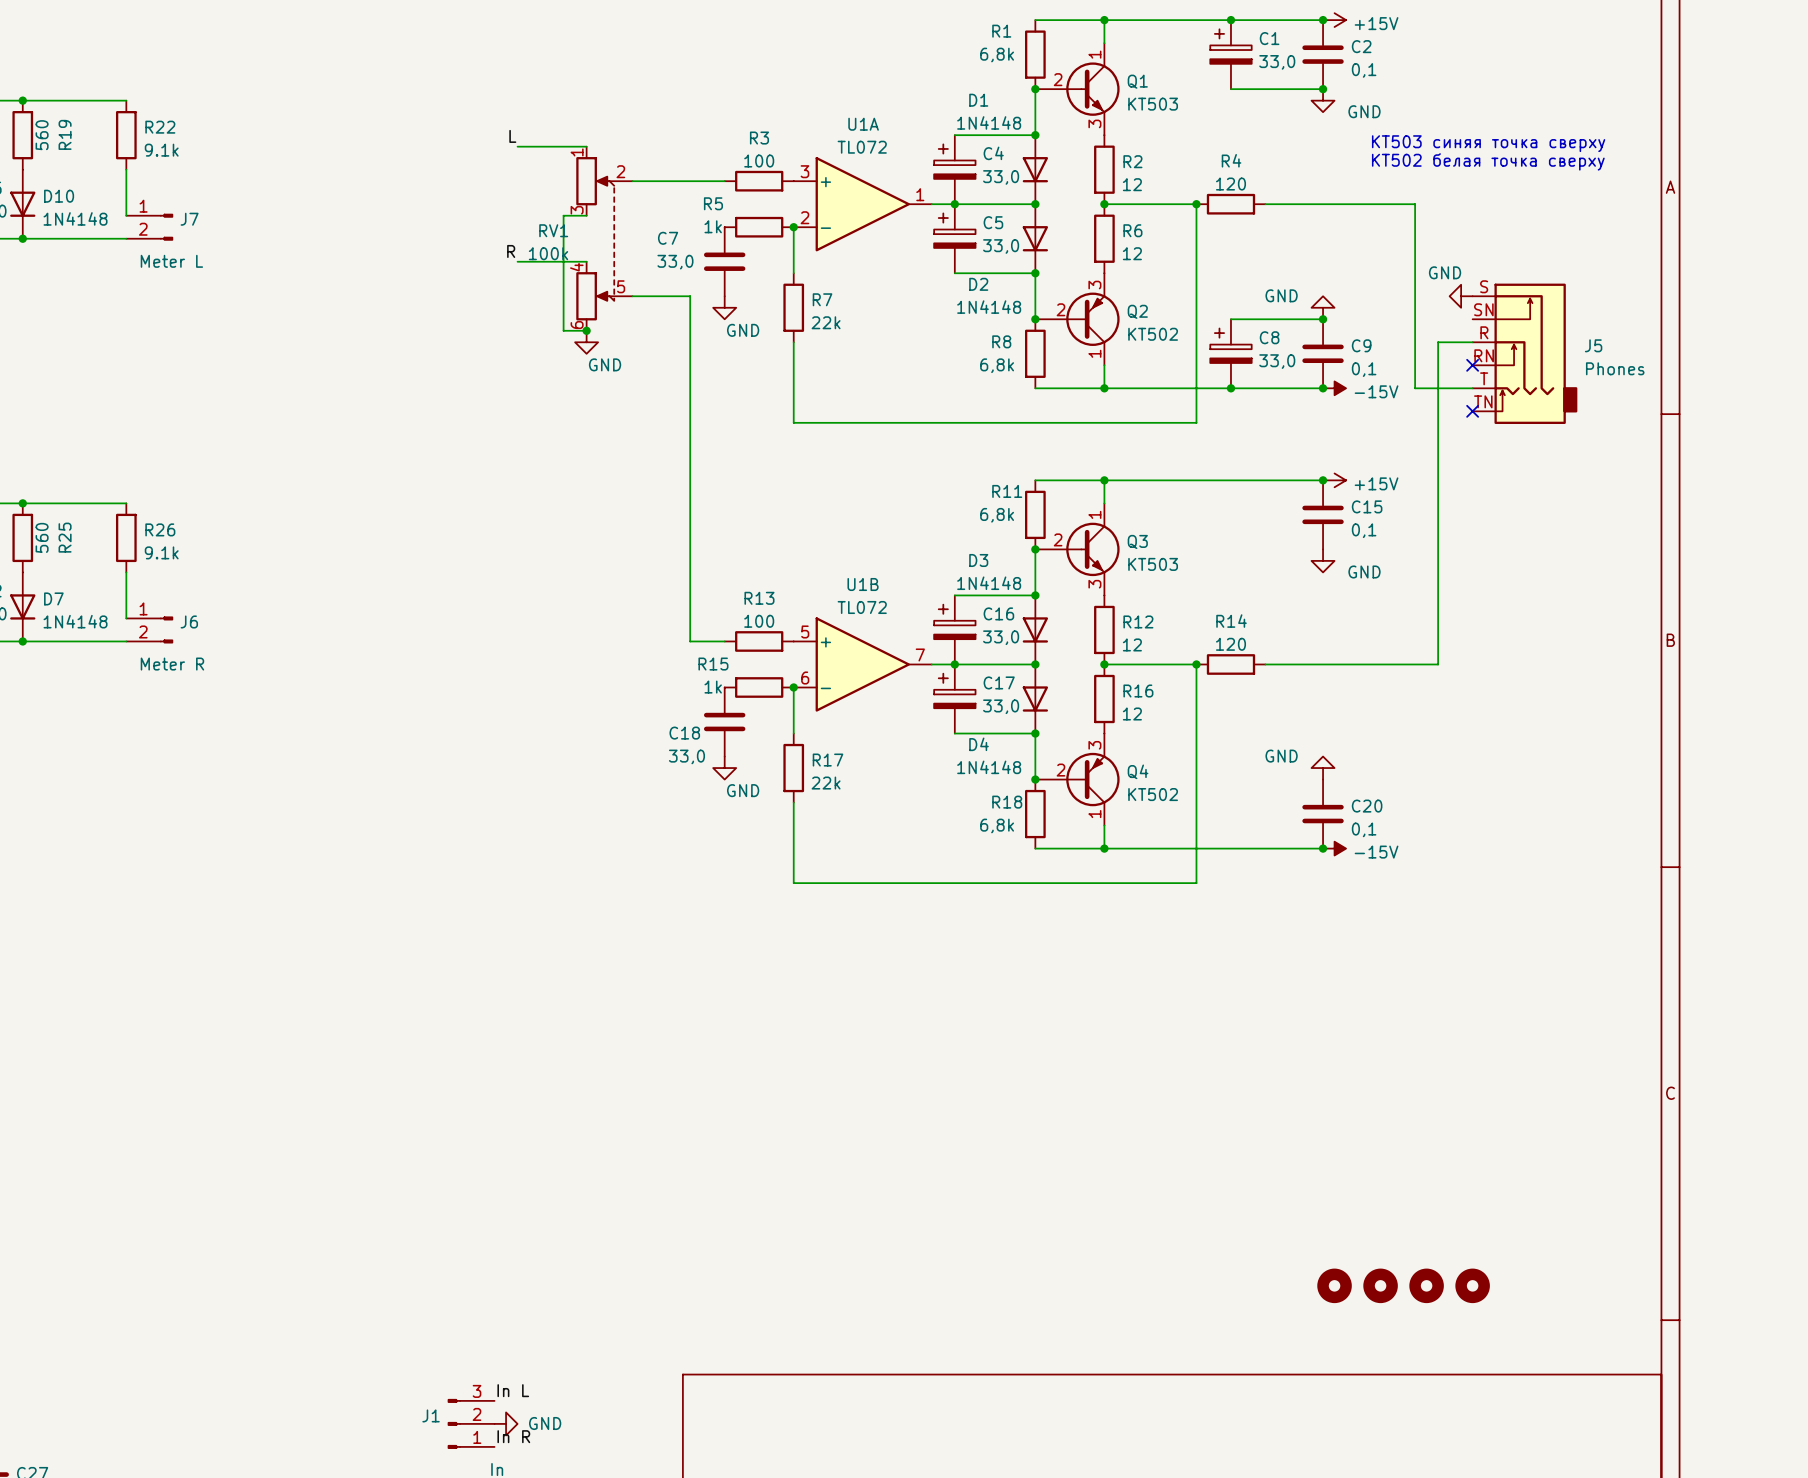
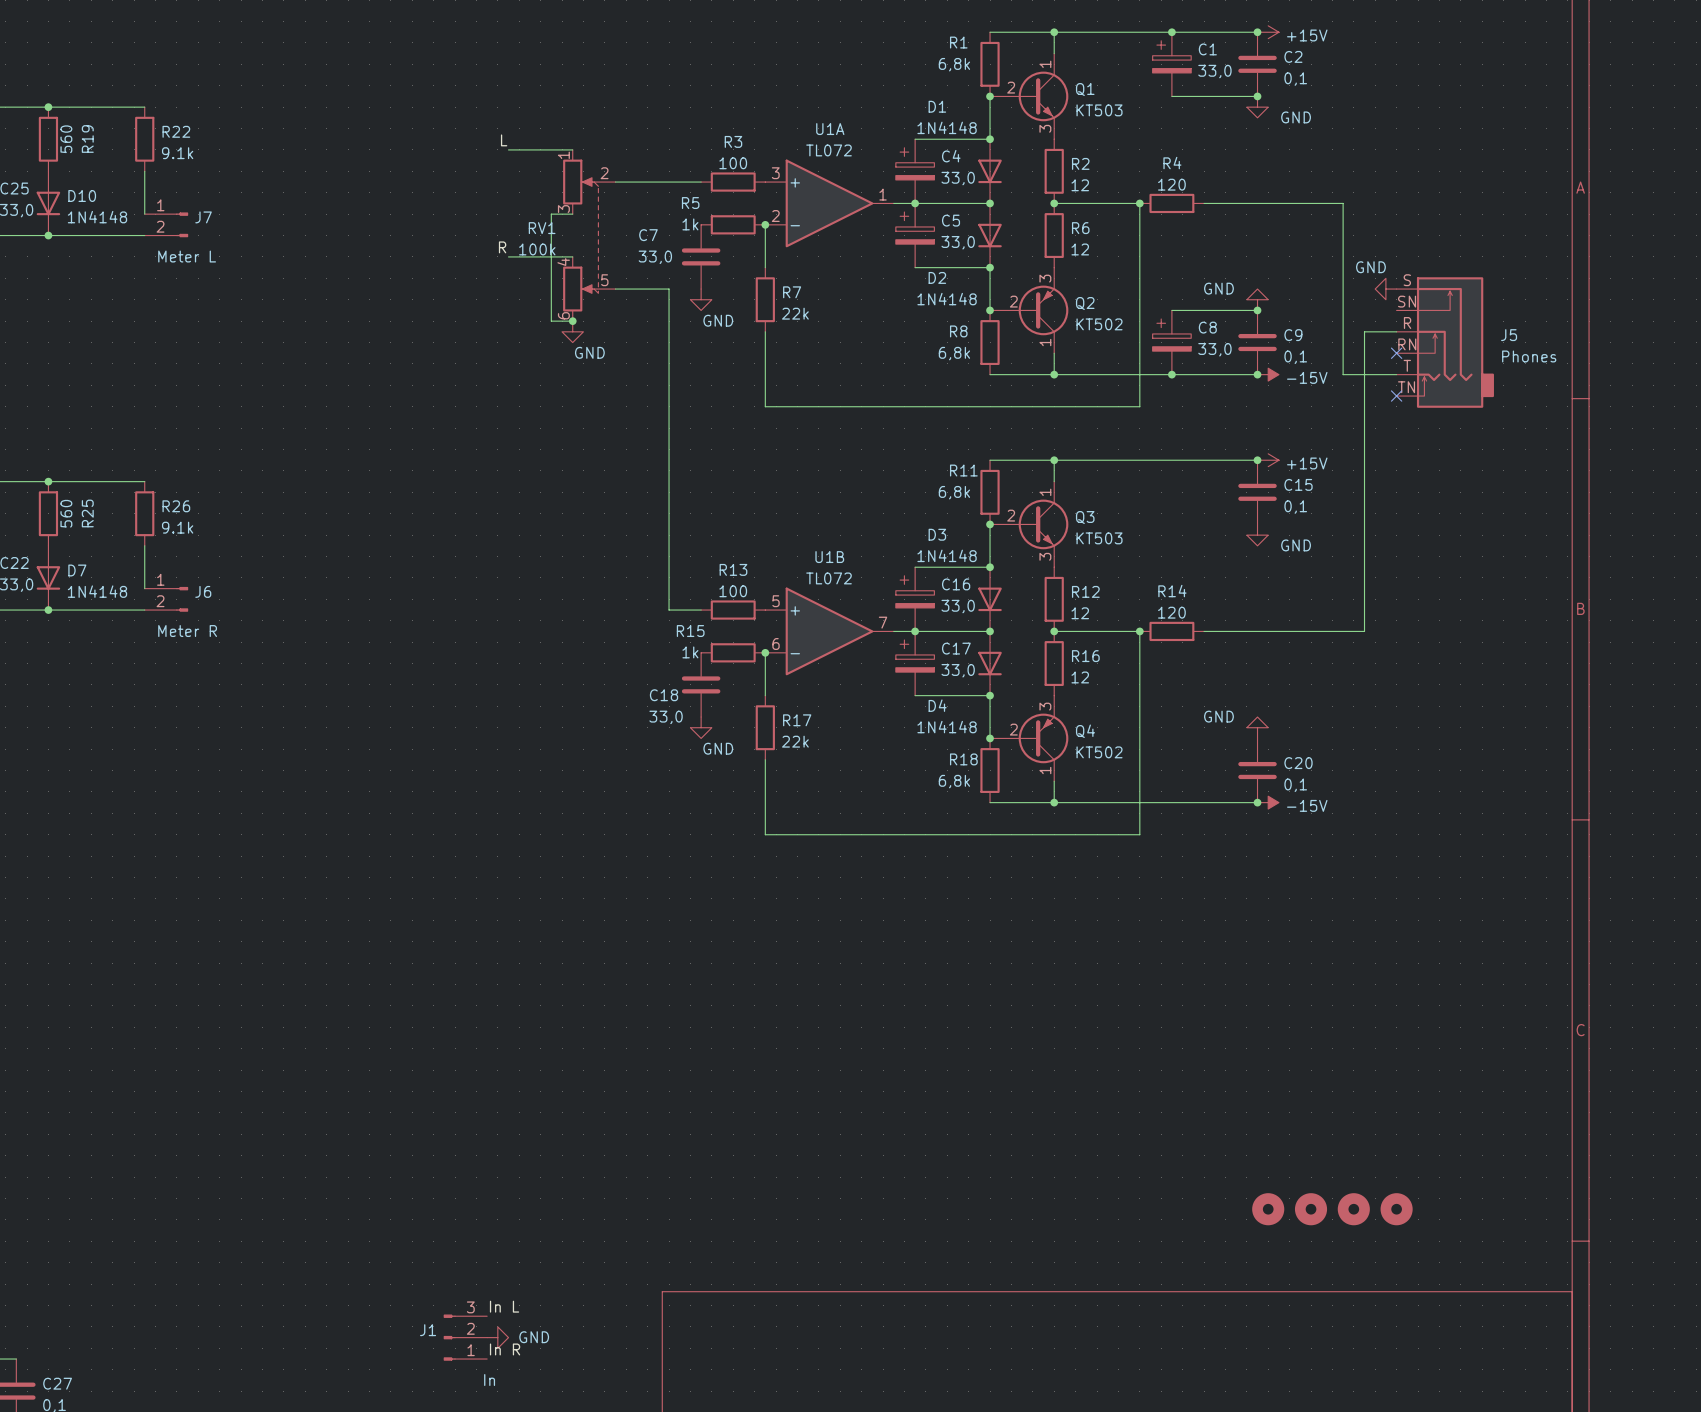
text: КТ503 синяя точка сверху (1488, 143) -> none
text: КТ502 белая точка сверху (1488, 161) -> none

